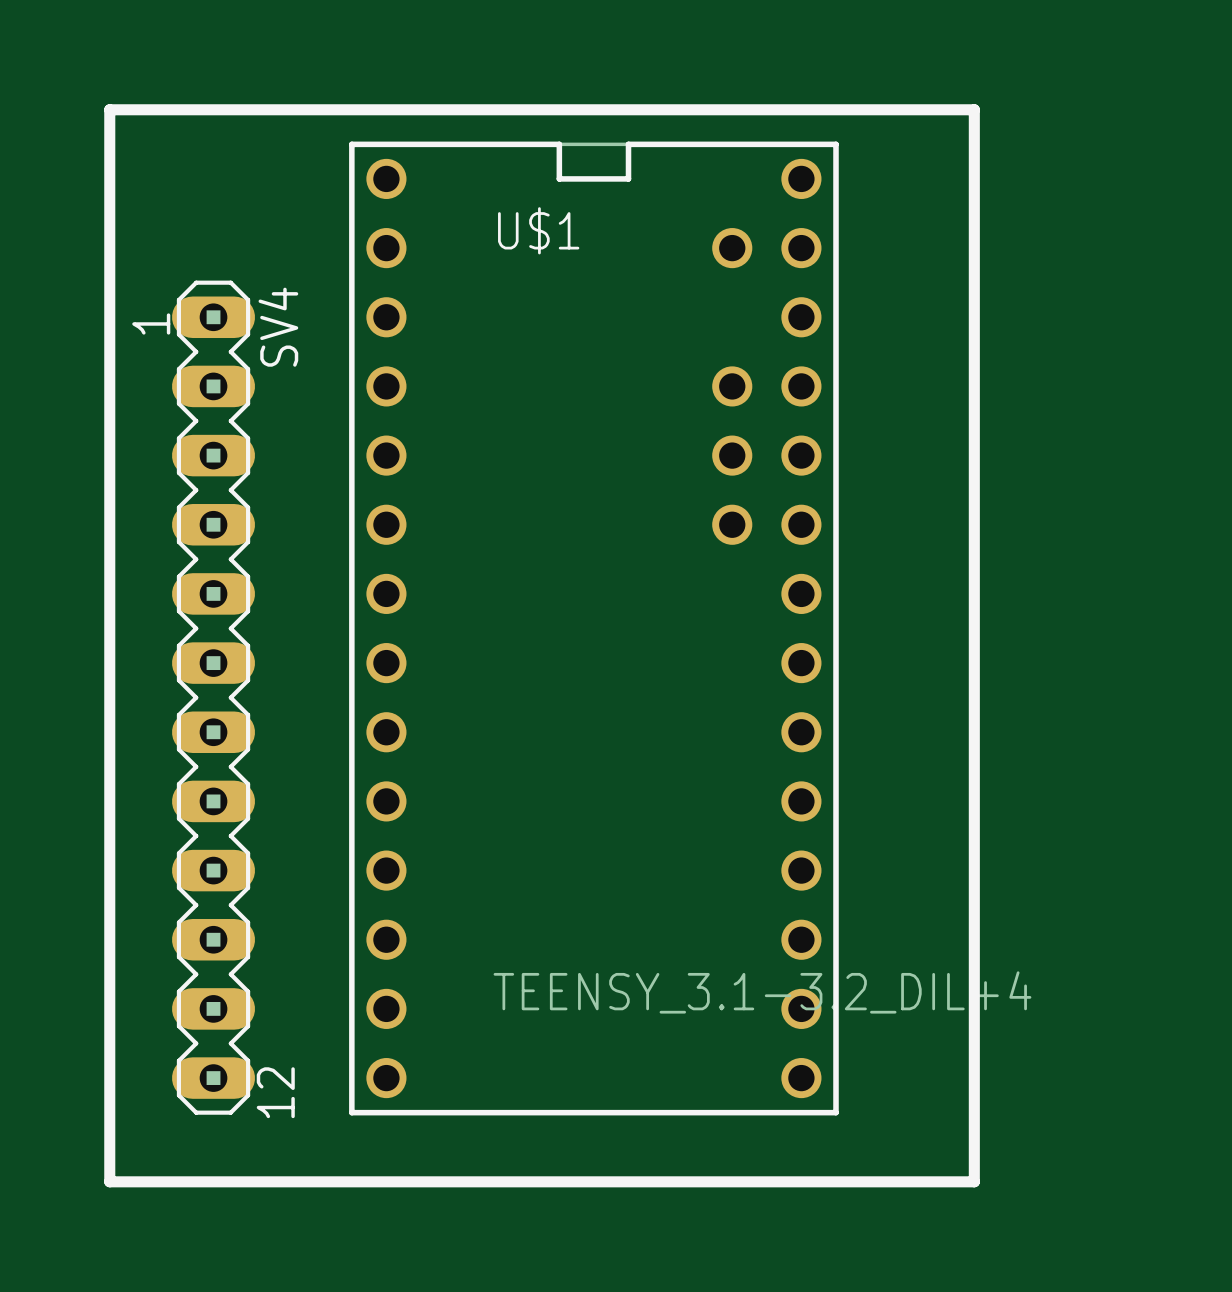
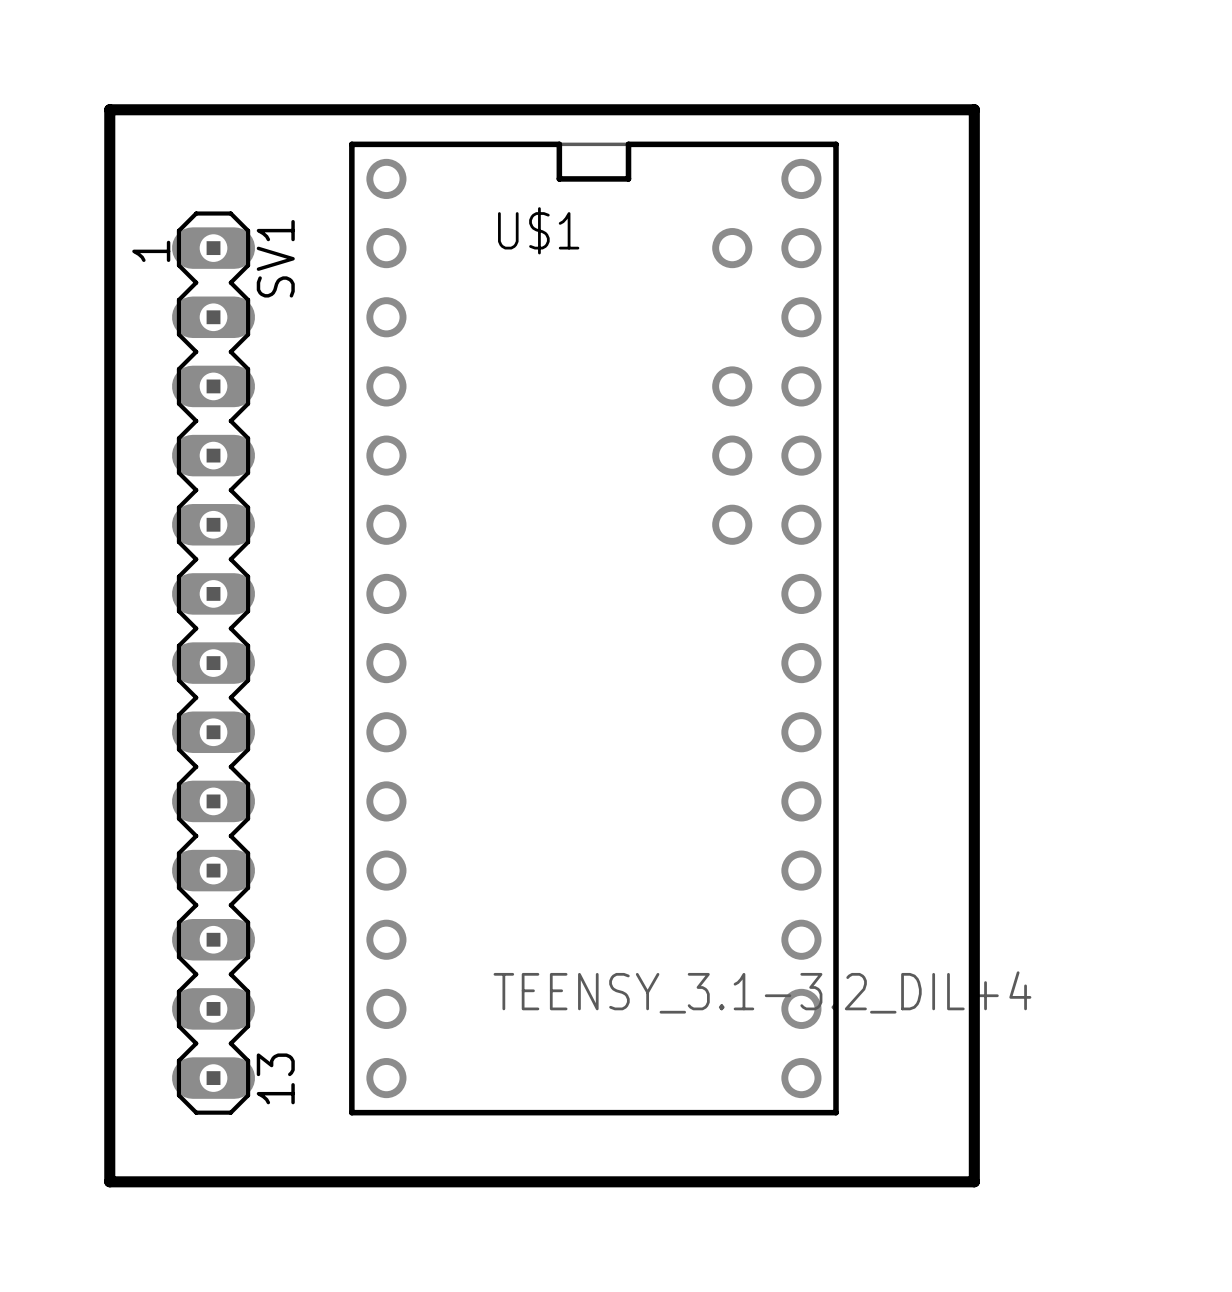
SV1: none -> (213, 663)
SV4: (213, 697) -> none

